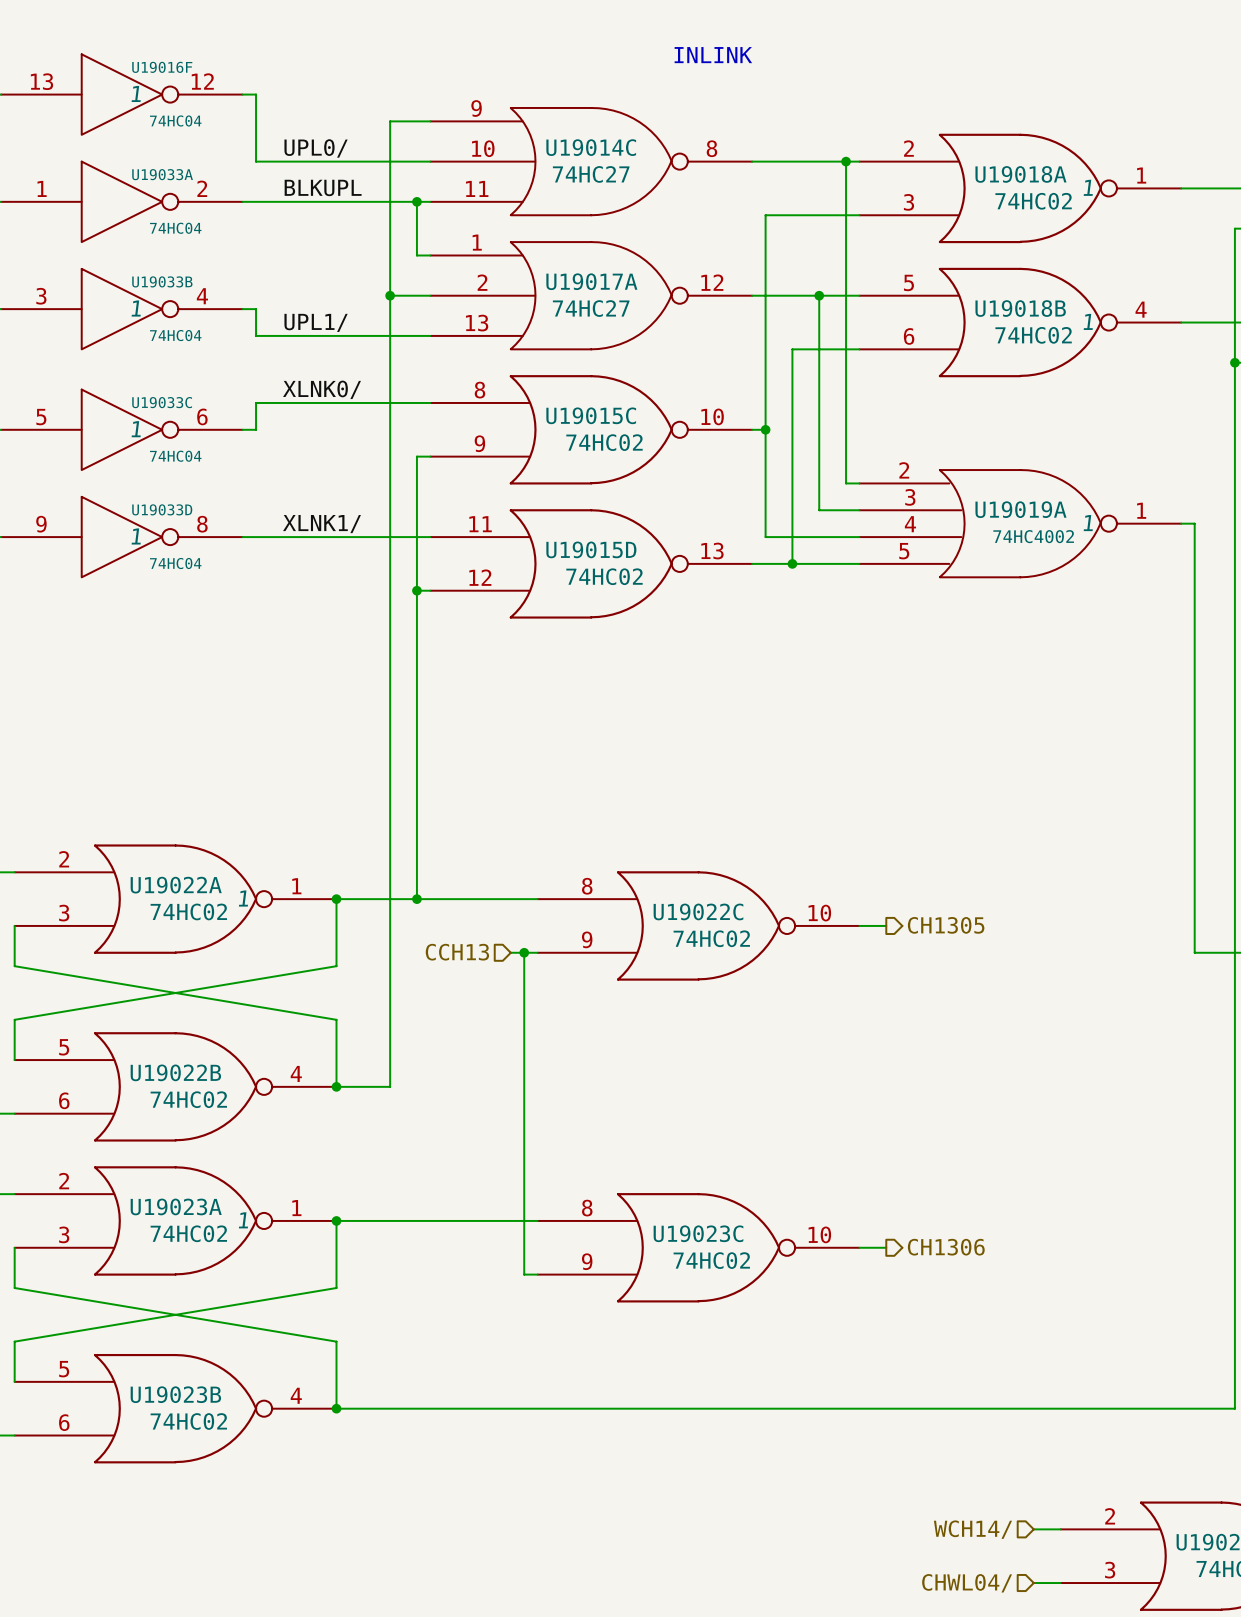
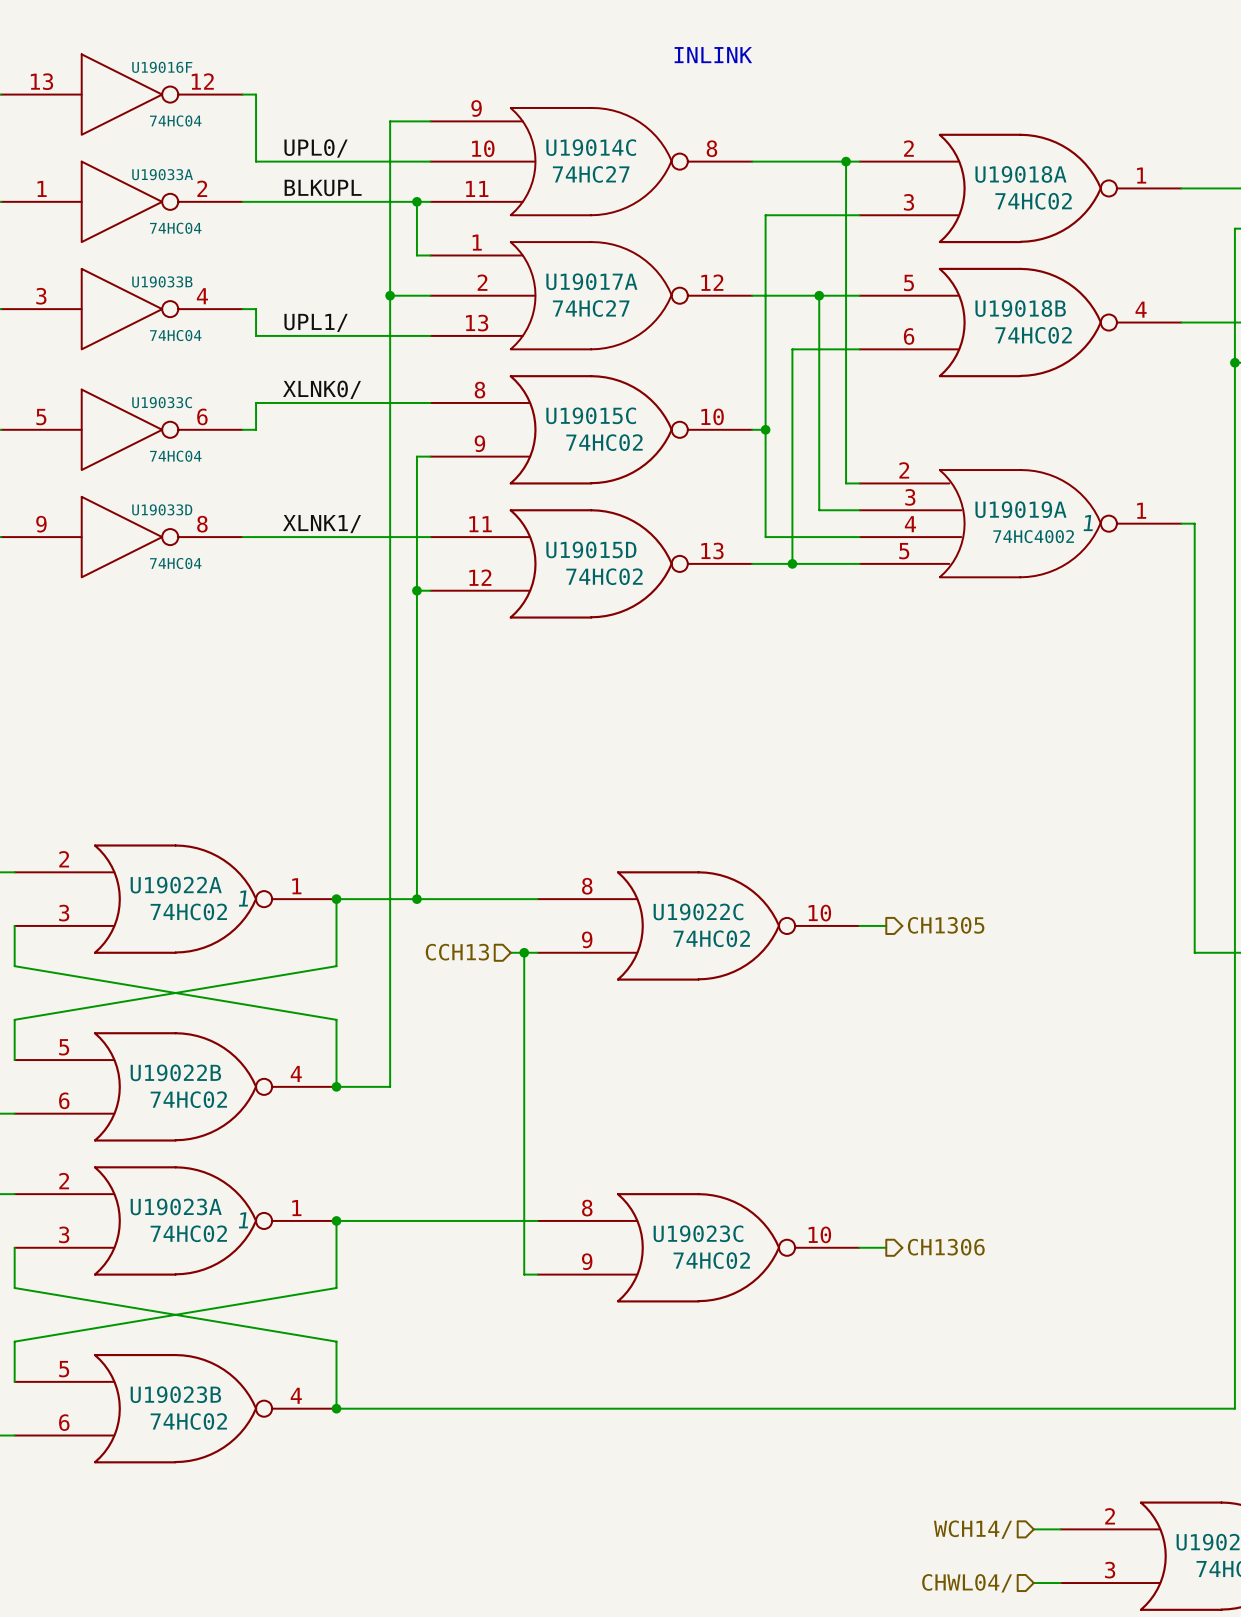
U19016F text: 1 (136, 93) -> none
U19018A text: 1 (1088, 187) -> none
U19033B text: 1 (136, 308) -> none
U19018B text: 1 (1088, 321) -> none
U19033C text: 1 (136, 429) -> none
U19033D text: 1 (136, 536) -> none

